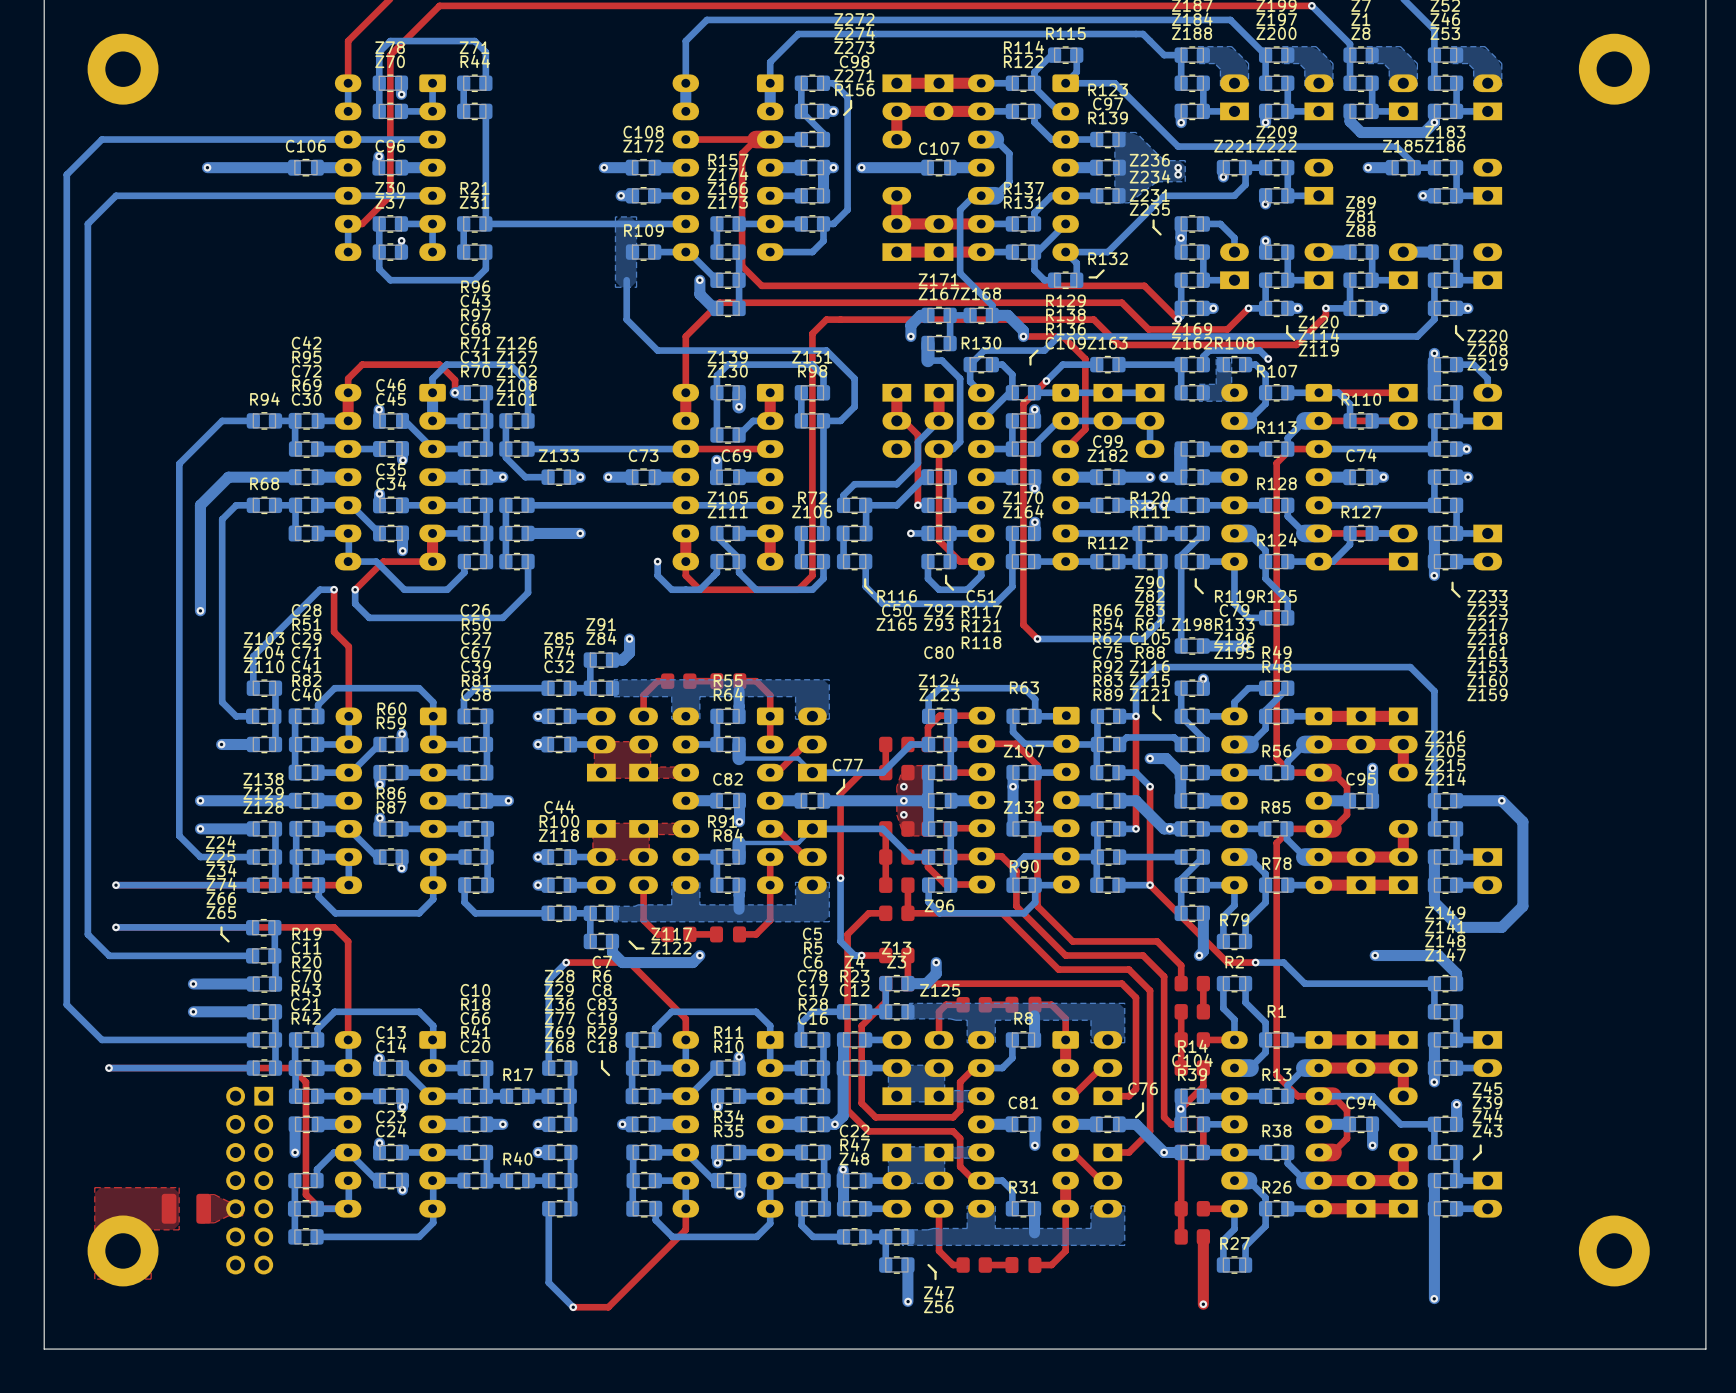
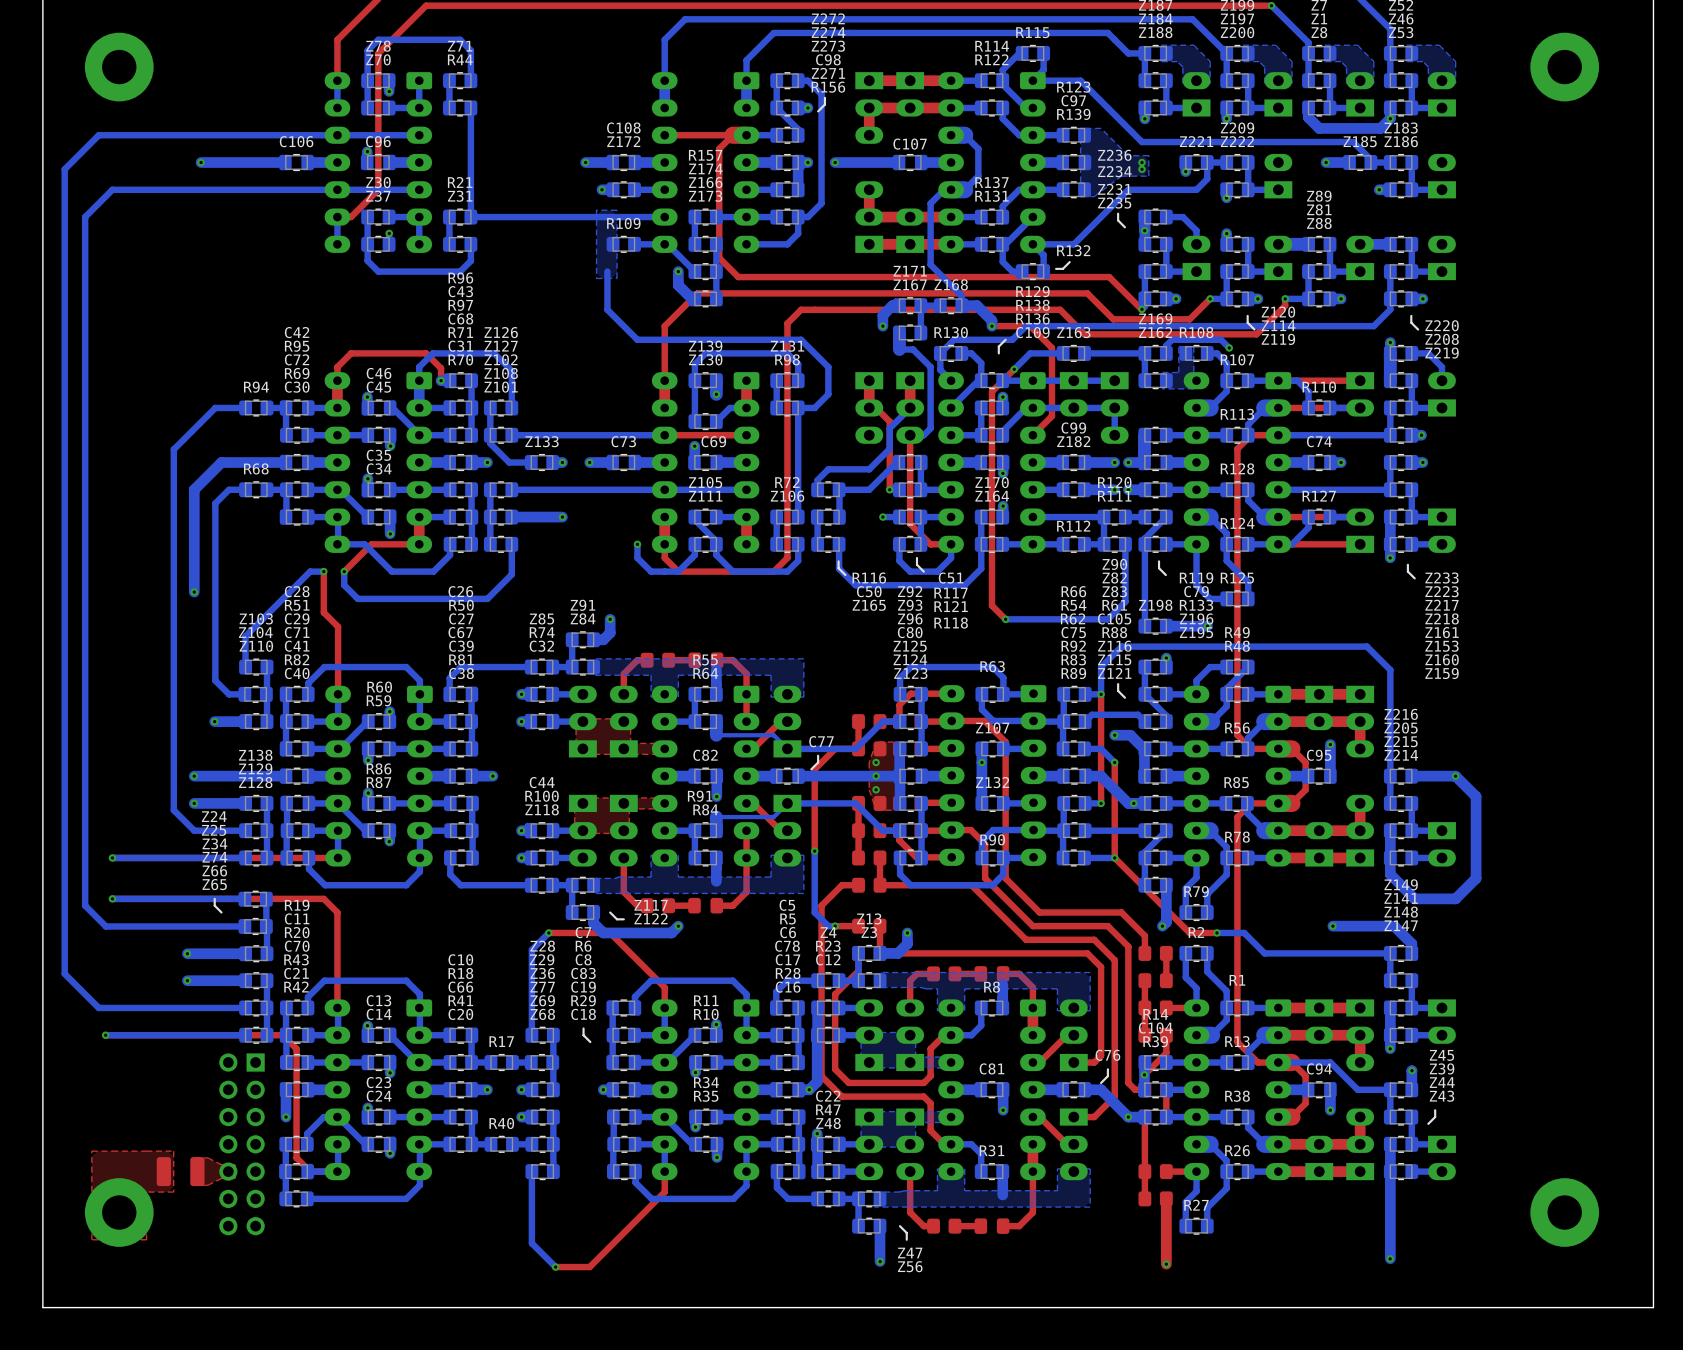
Z96 name position: Z96 (939, 905) -> Z96 (910, 618)
Z125 name position: Z125 (940, 990) -> Z125 (910, 646)

